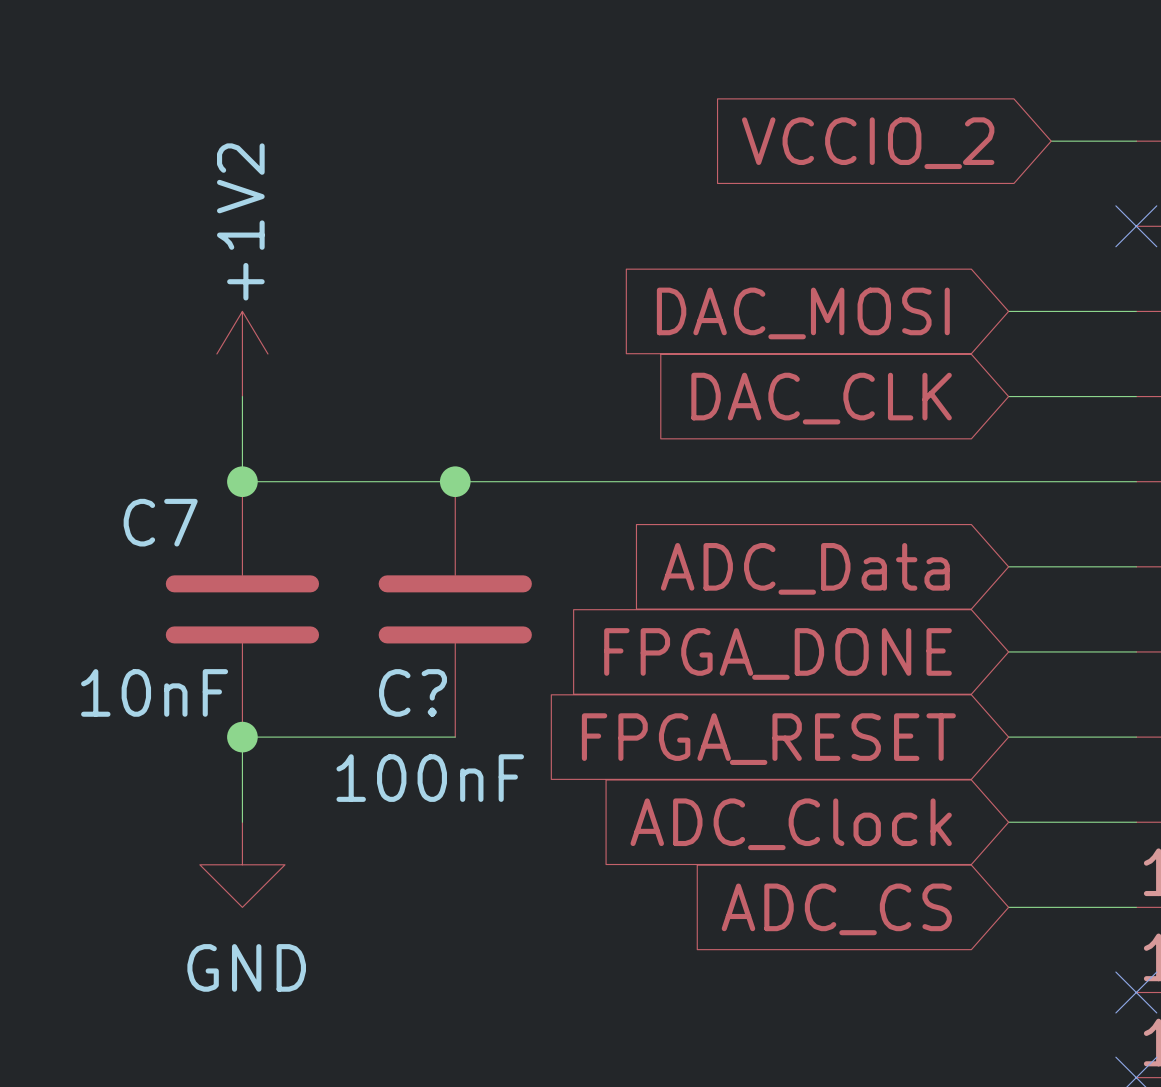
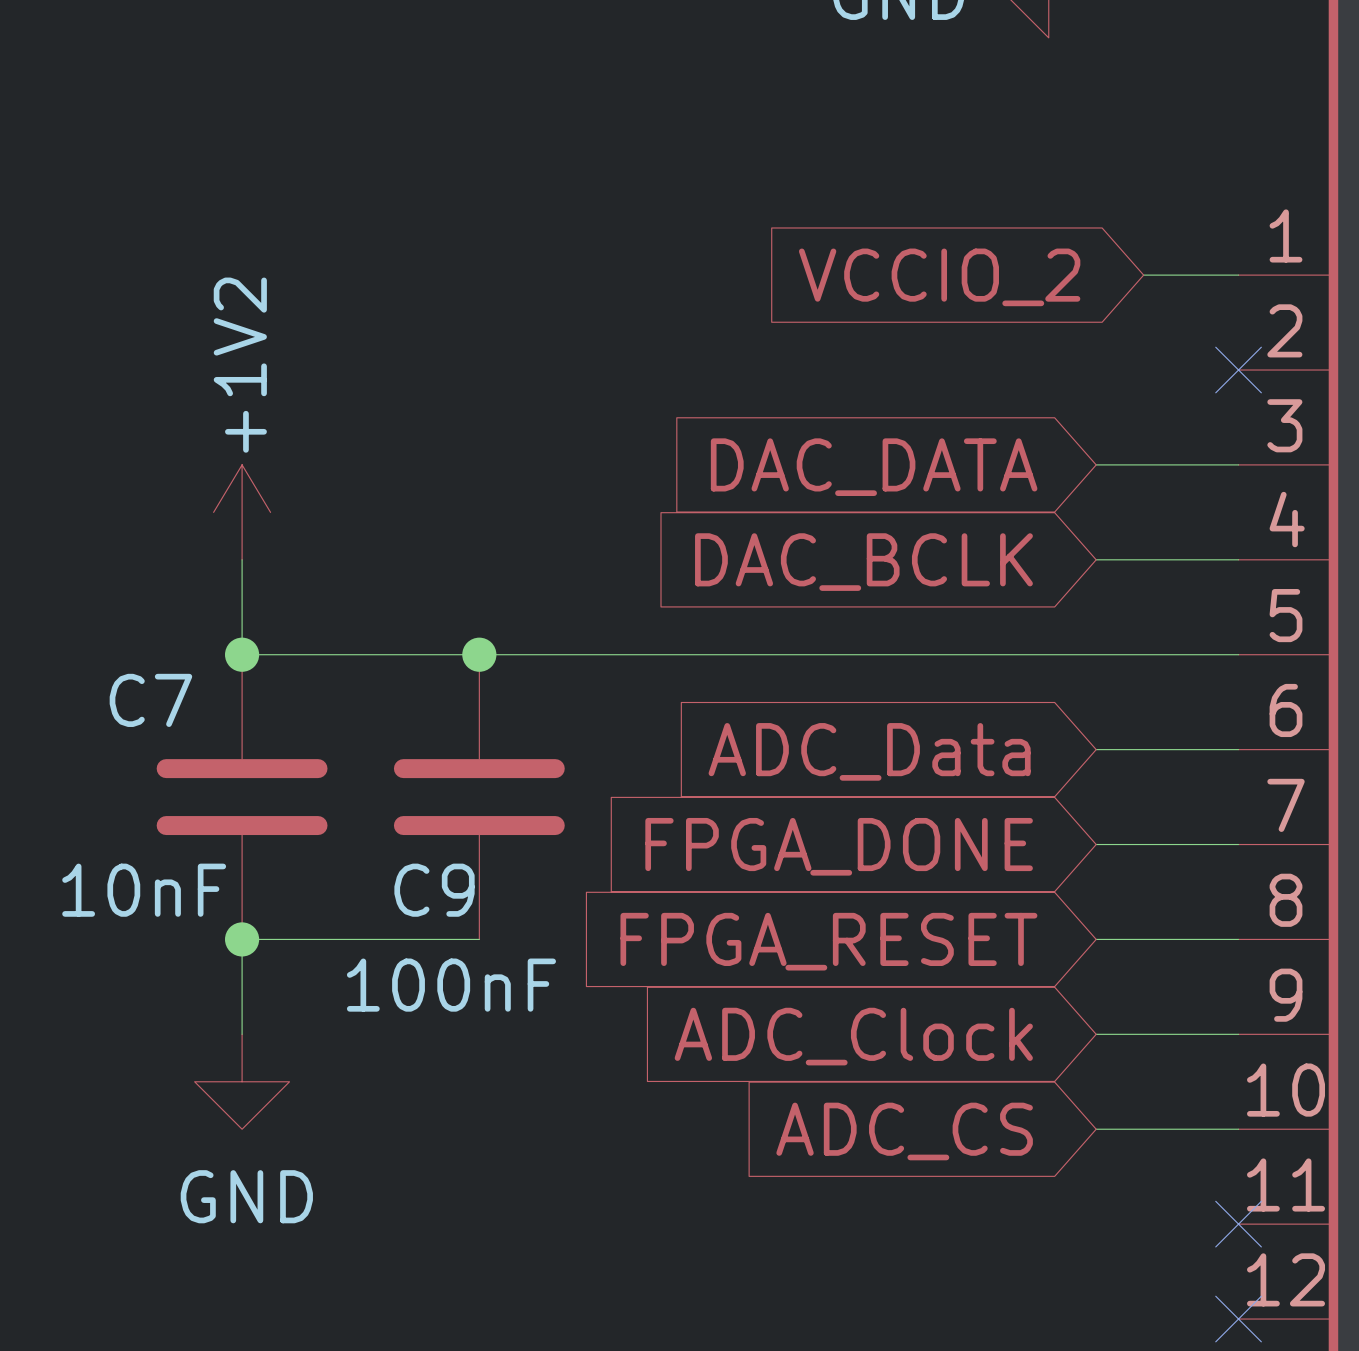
global label: DAC_MOSI (803, 313) -> DAC_DATA (874, 467)
global label: DAC_CLK (821, 398) -> DAC_BCLK (863, 562)
C? name: C? (413, 692) -> C9 (434, 890)

